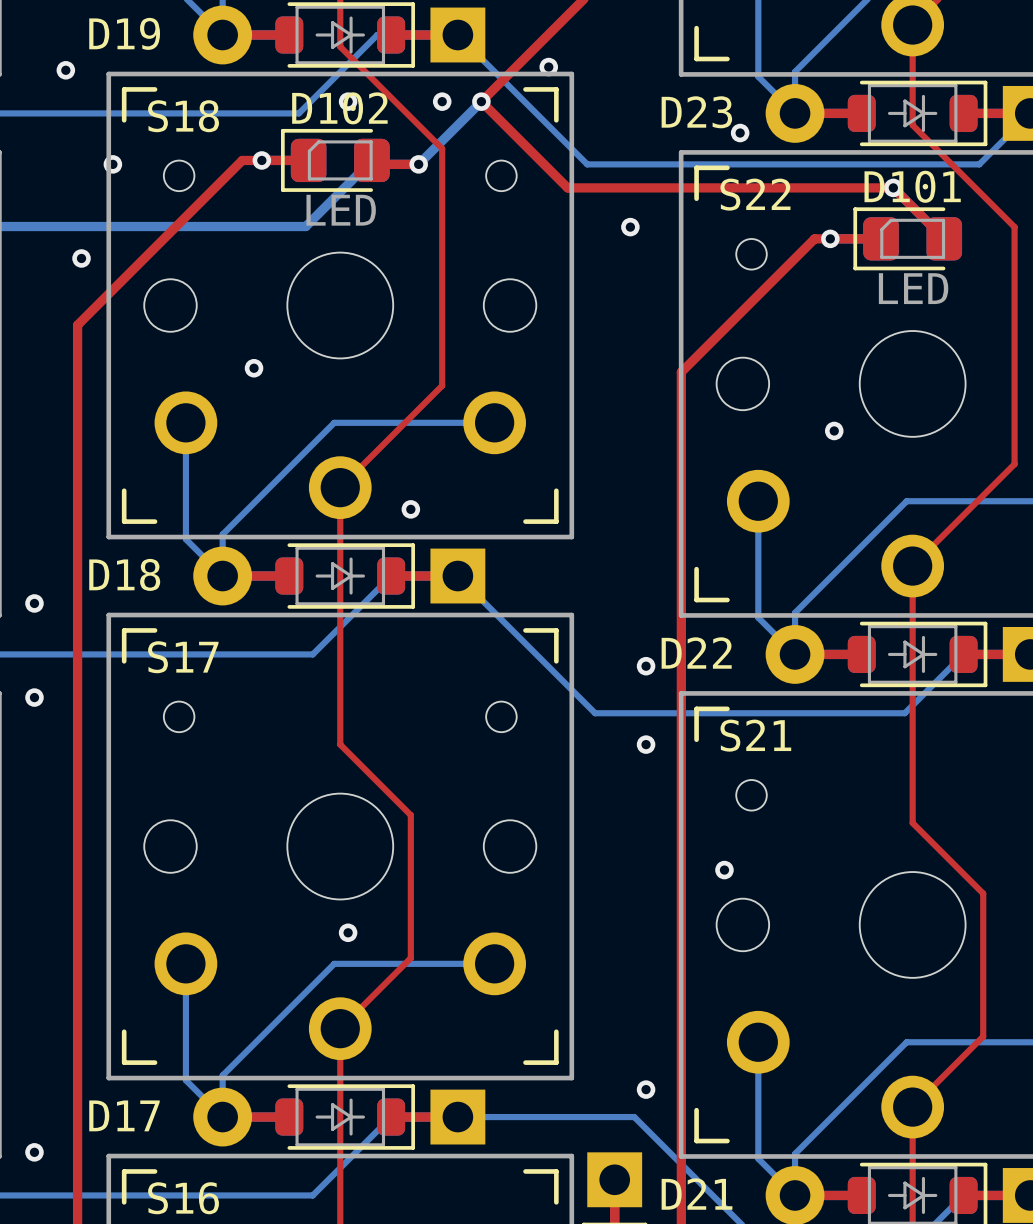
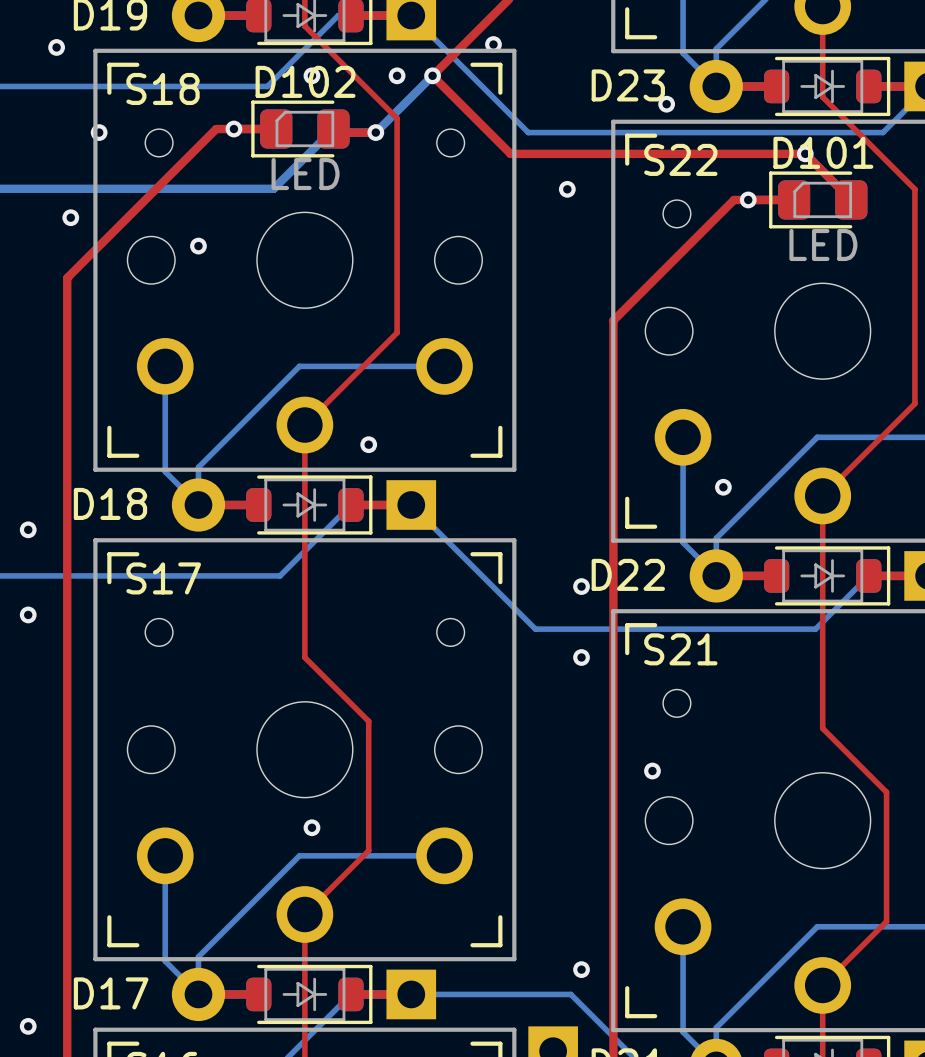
via position: (254, 368) -> (198, 246)
via position: (834, 430) -> (723, 487)

